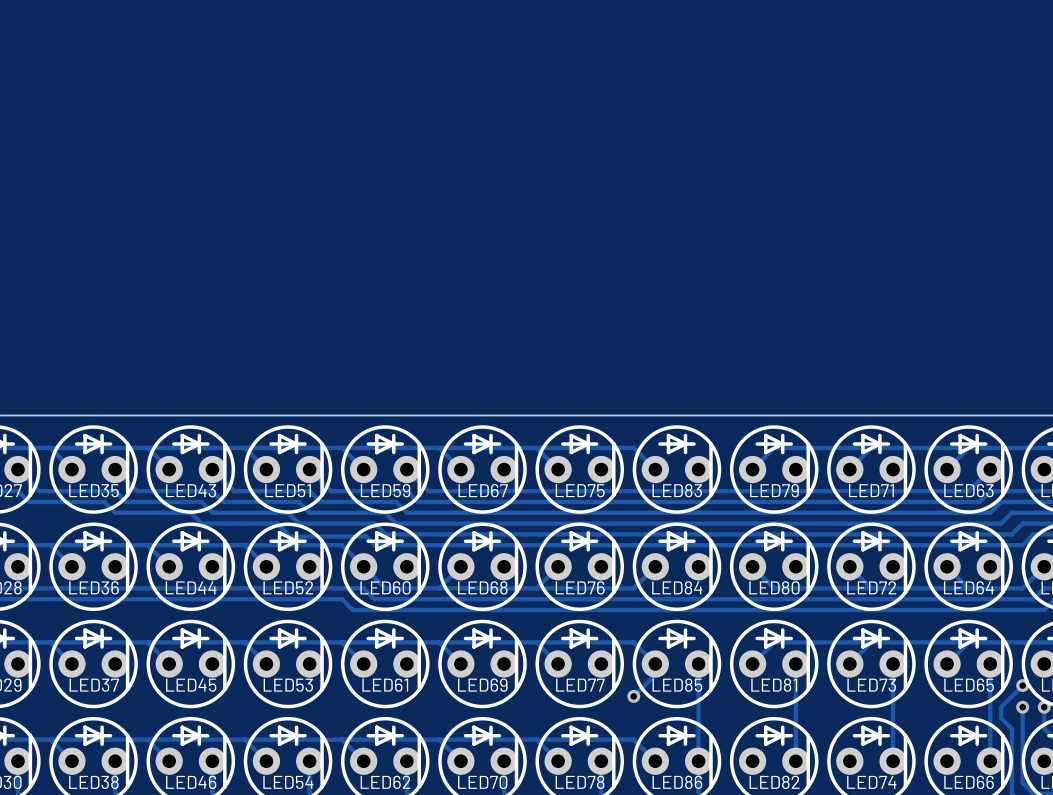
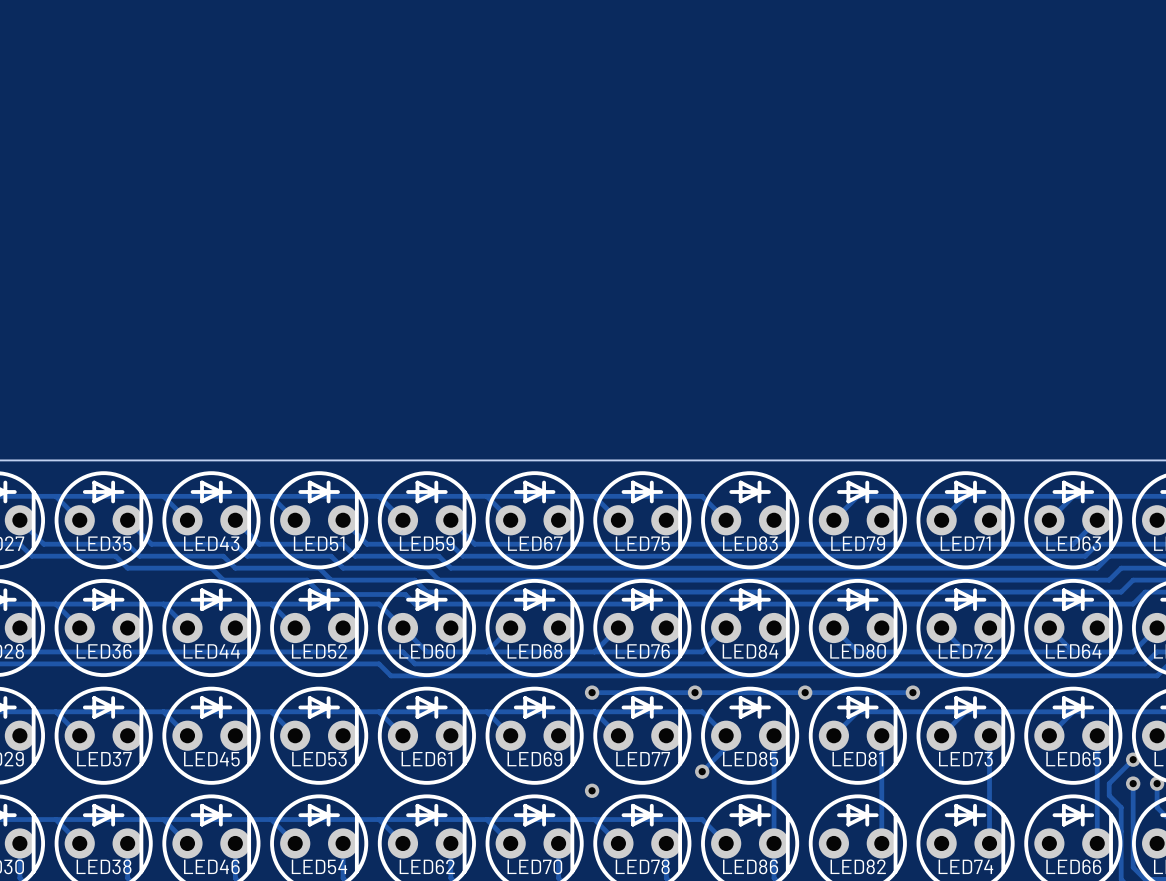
track: none -> (592, 692) (912, 692)
via: none -> (592, 692)
via: none -> (695, 692)
via: none -> (805, 692)
via: none -> (912, 692)
via: none -> (592, 790)

